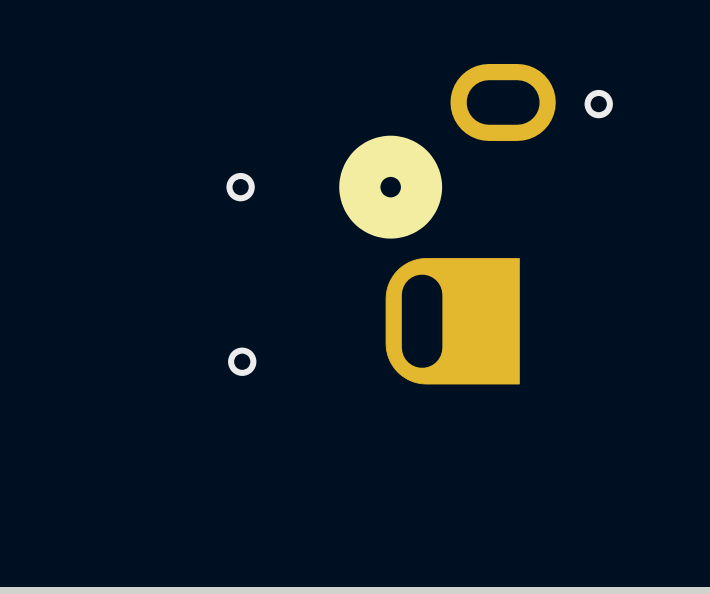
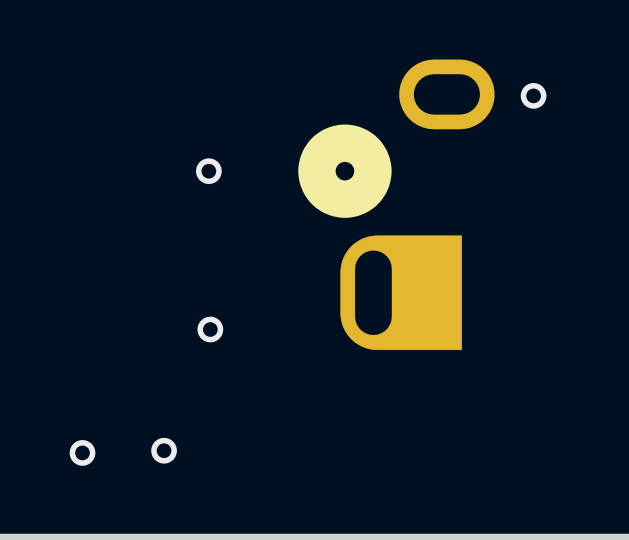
via: none -> (164, 450)
via: none -> (82, 452)

